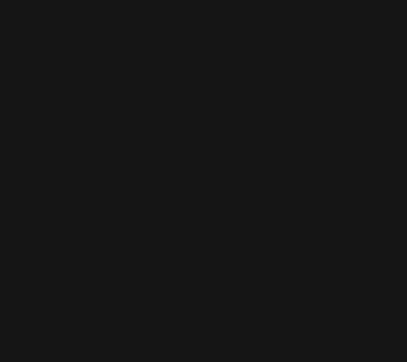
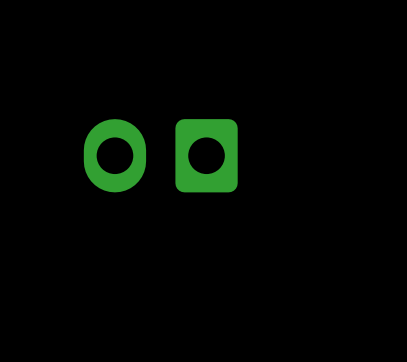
part: none -> (160, 155)

